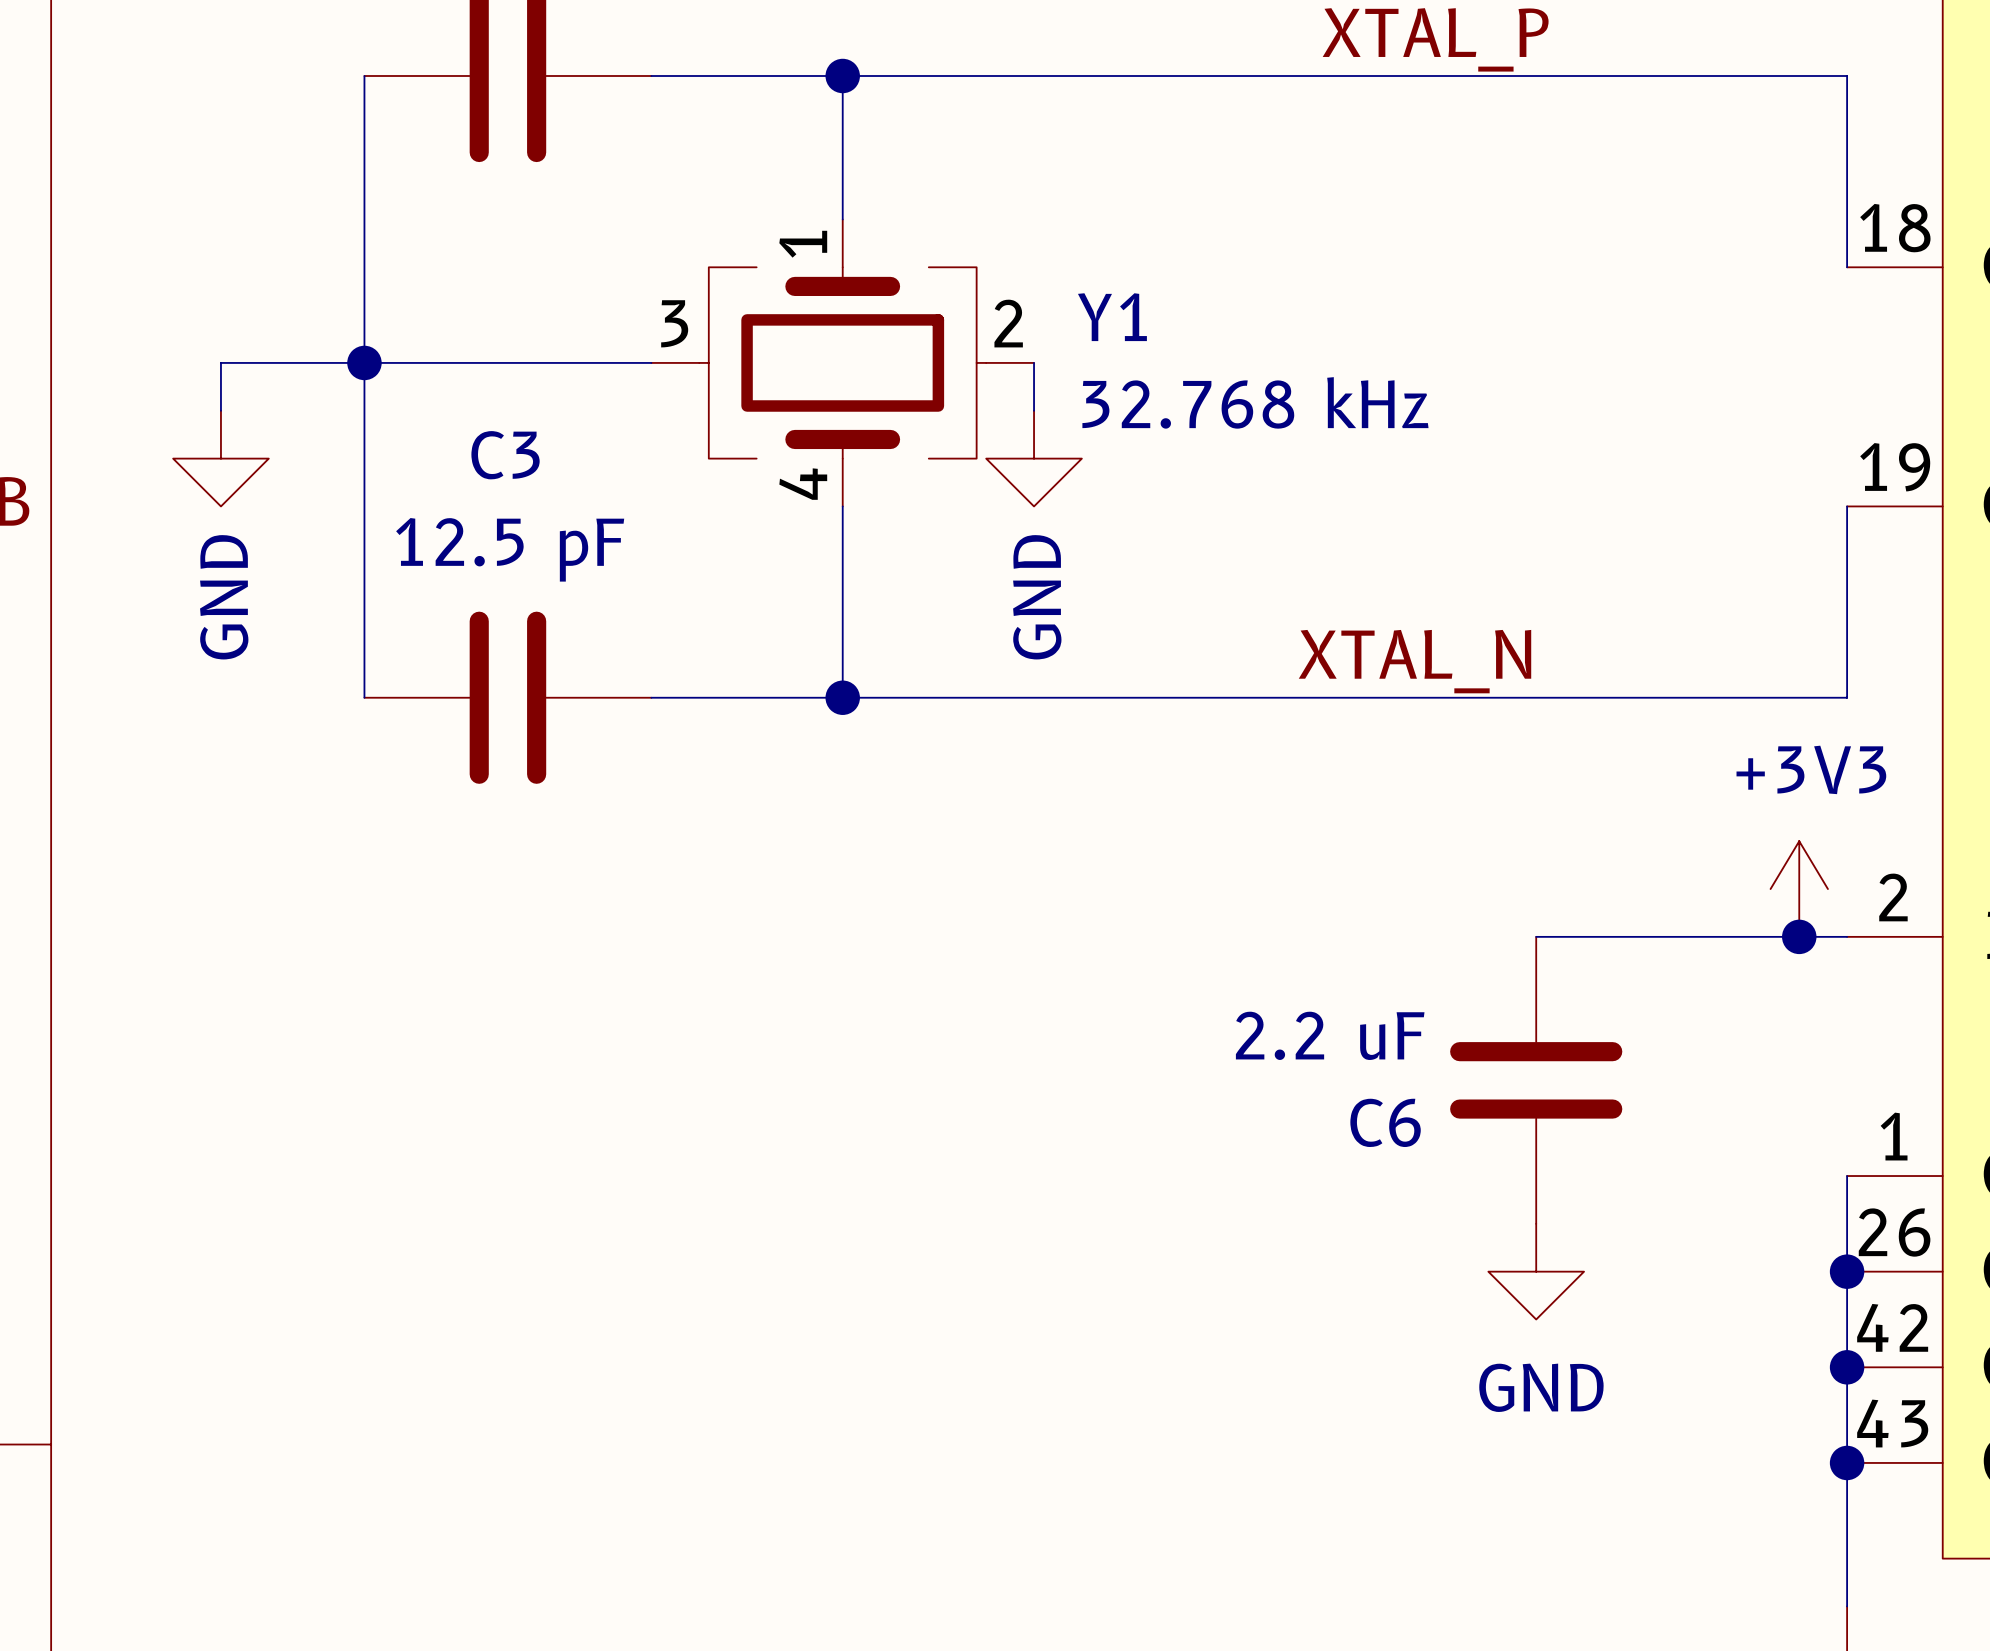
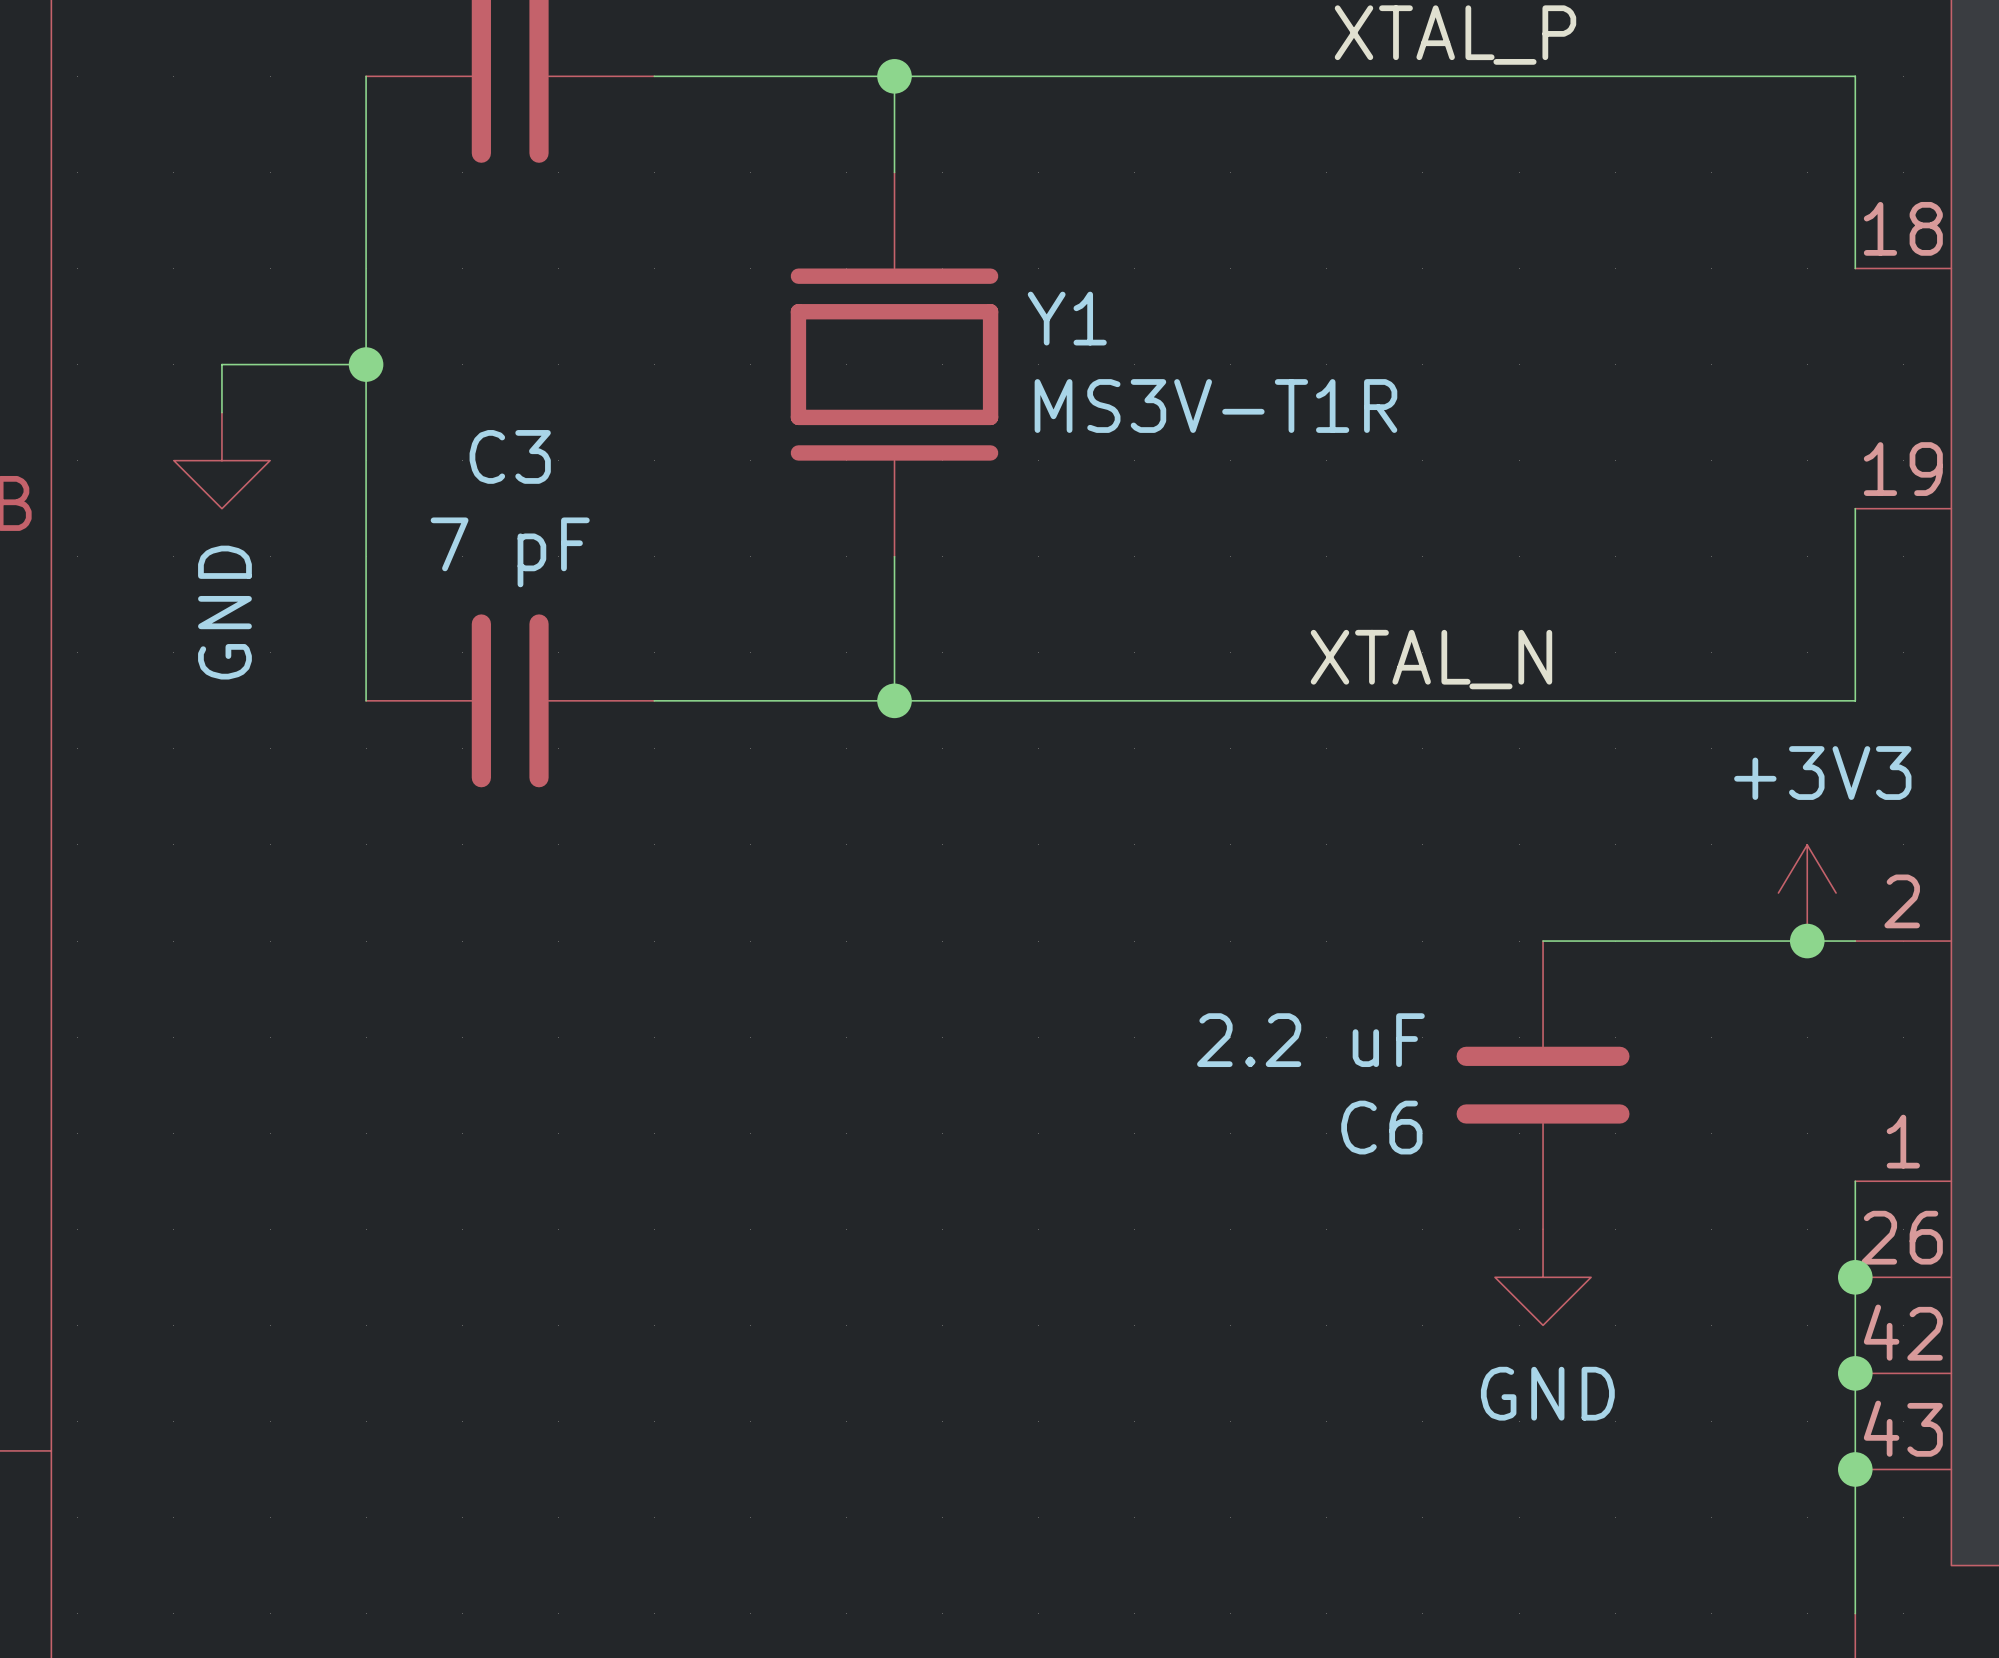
wire: (842, 75) (842, 219) -> (894, 556) (894, 700)
junction position: (842, 75) -> (894, 76)
wire: none -> (894, 76) (894, 172)
Y1 symbol: [651, 219, 1035, 507] -> [790, 172, 999, 557]
Y1 name position: Y1 (1112, 317) -> Y1 (1067, 318)
wire: (364, 362) (651, 362) -> none
wire: (1034, 362) (1034, 410) -> none
Y1 value: 32.768 kHz (1255, 402) -> MS3V-T1R (1215, 406)
power symbol: GND (1034, 458) -> none
wire: (842, 506) (842, 697) -> none
C3 value: 12.5 pF (510, 549) -> 7 pF (510, 552)
junction position: (842, 697) -> (894, 700)

